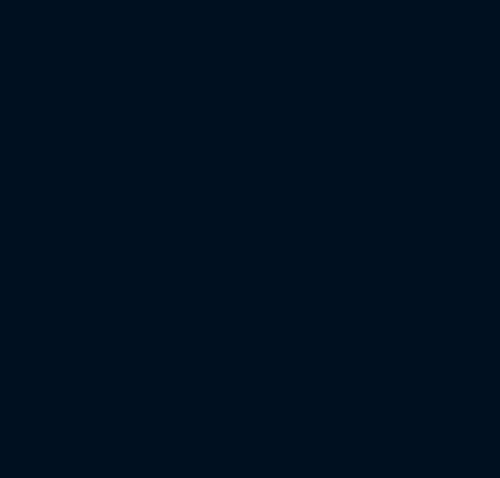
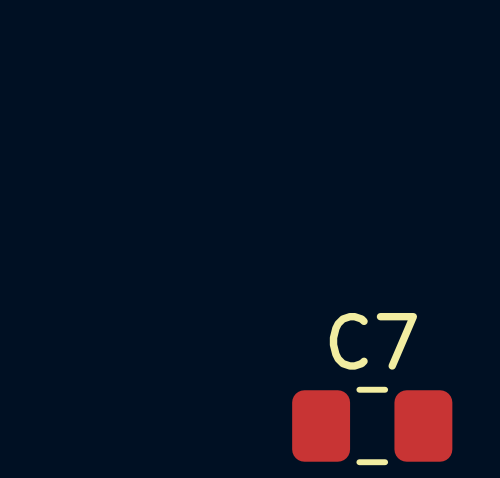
C7: none -> (372, 425)

